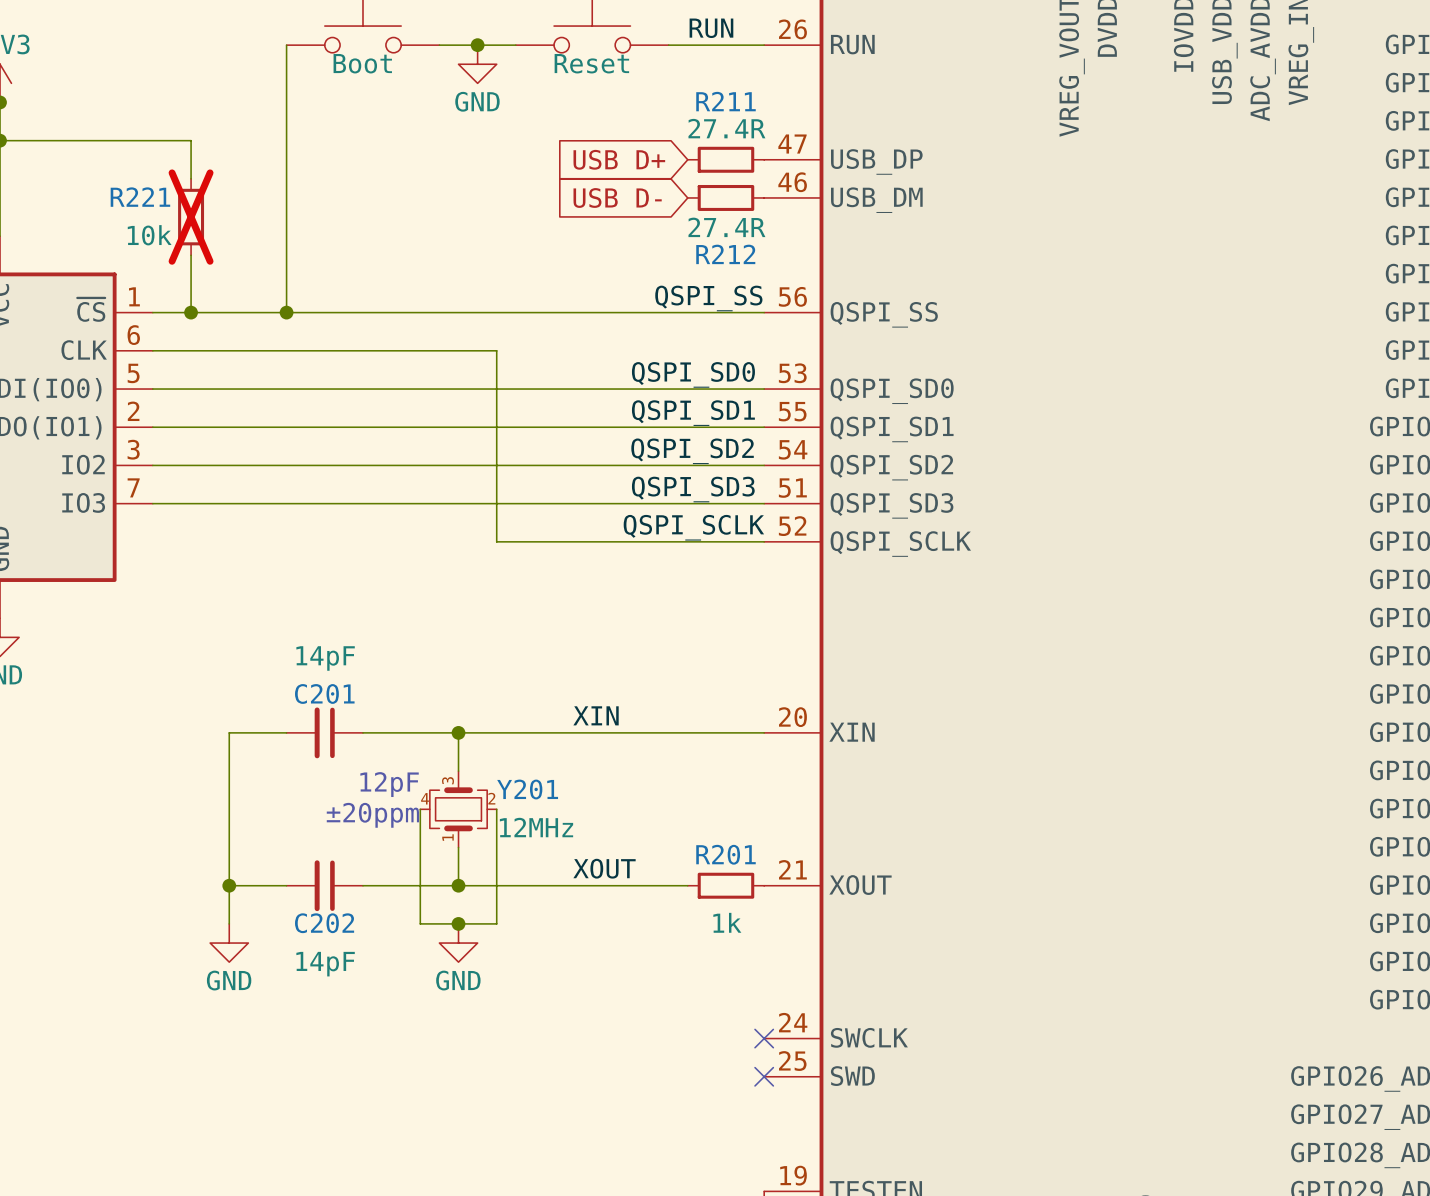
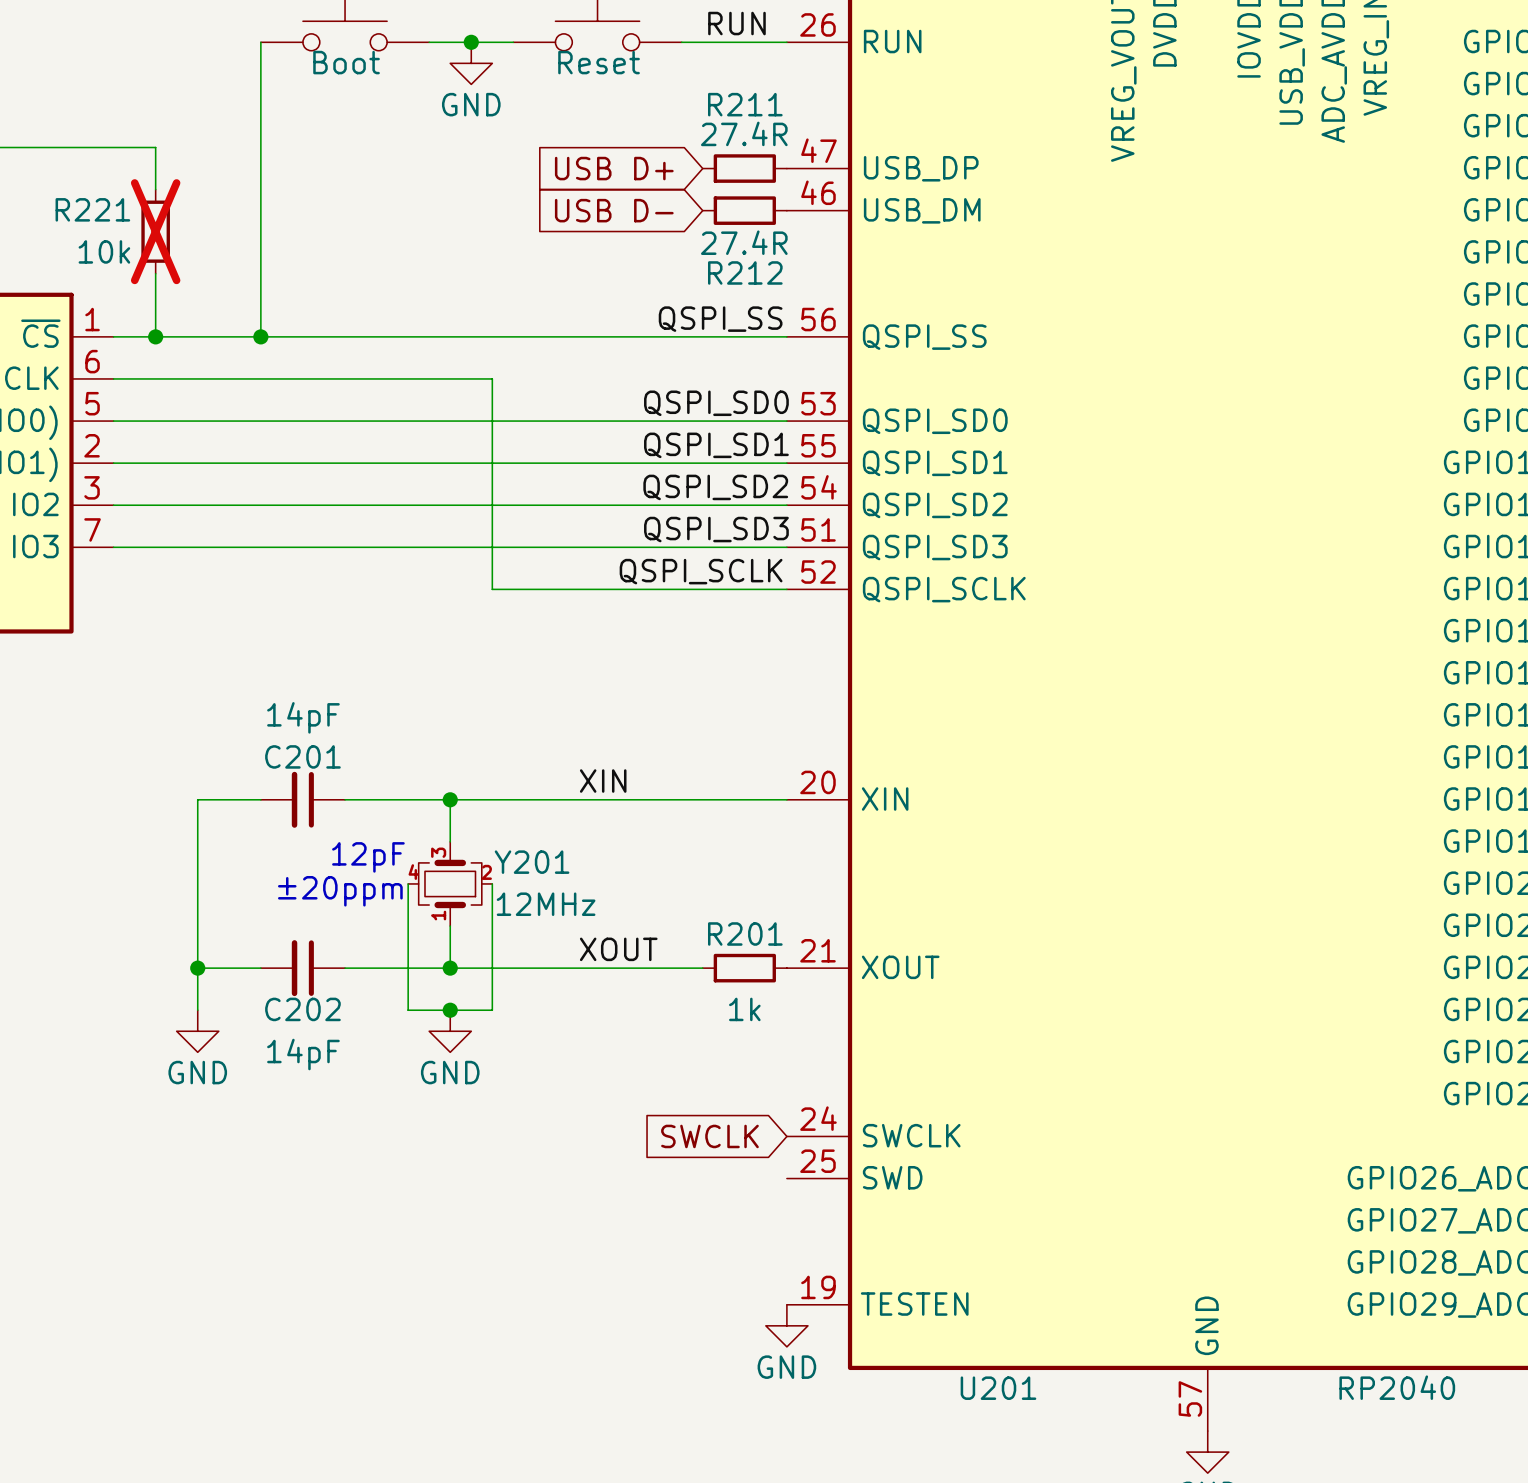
global label: none -> SWCLK (709, 1136)
no-connect mark: (764, 1038) -> none
no-connect mark: (764, 1076) -> none

